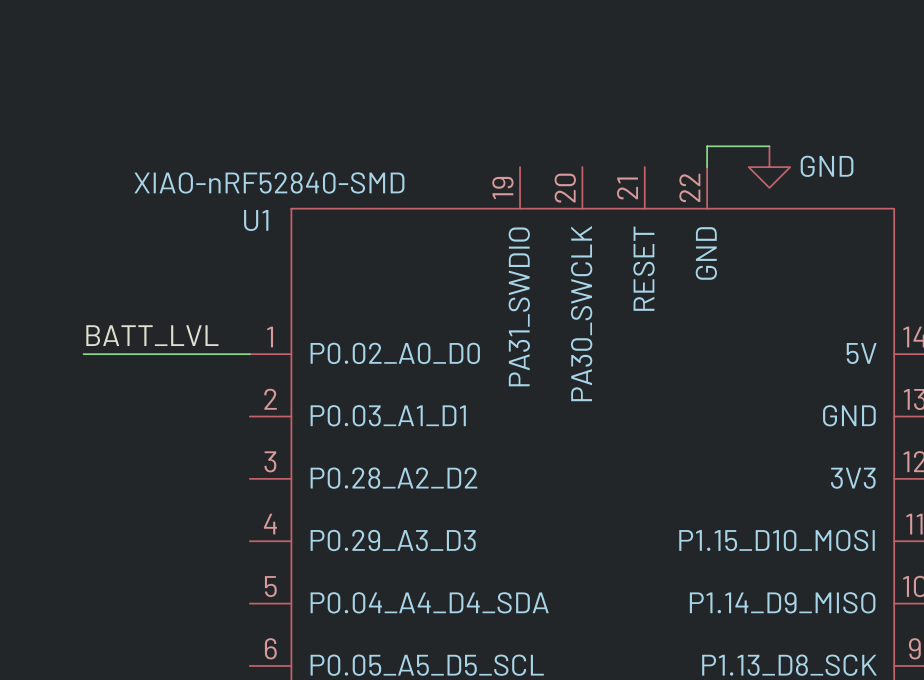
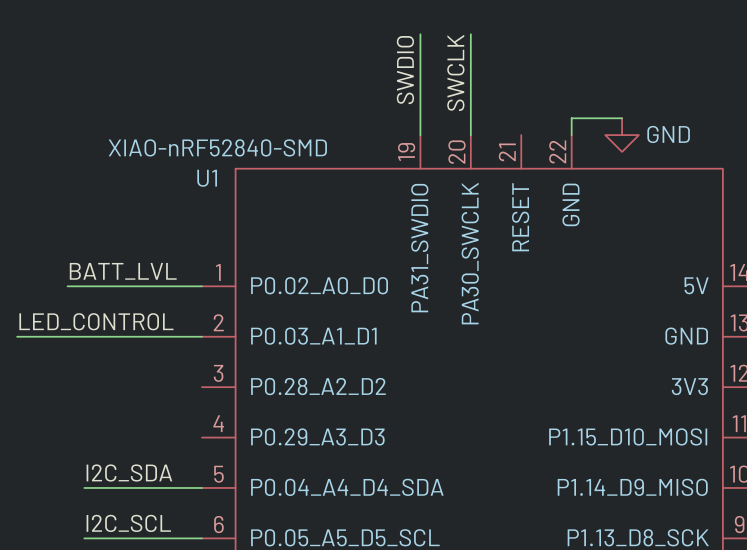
wire: none -> (420, 34) (420, 135)
wire: none -> (470, 34) (470, 135)
label: none -> SWDIO (405, 70)
label: none -> SWCLK (455, 72)
label: none -> LED_CONTROL (96, 321)
wire: none -> (17, 336) (201, 336)
label: none -> I2C_SDA (129, 473)
wire: none -> (84, 487) (201, 487)
label: none -> I2C_SCL (128, 523)
wire: none -> (84, 538) (201, 538)

